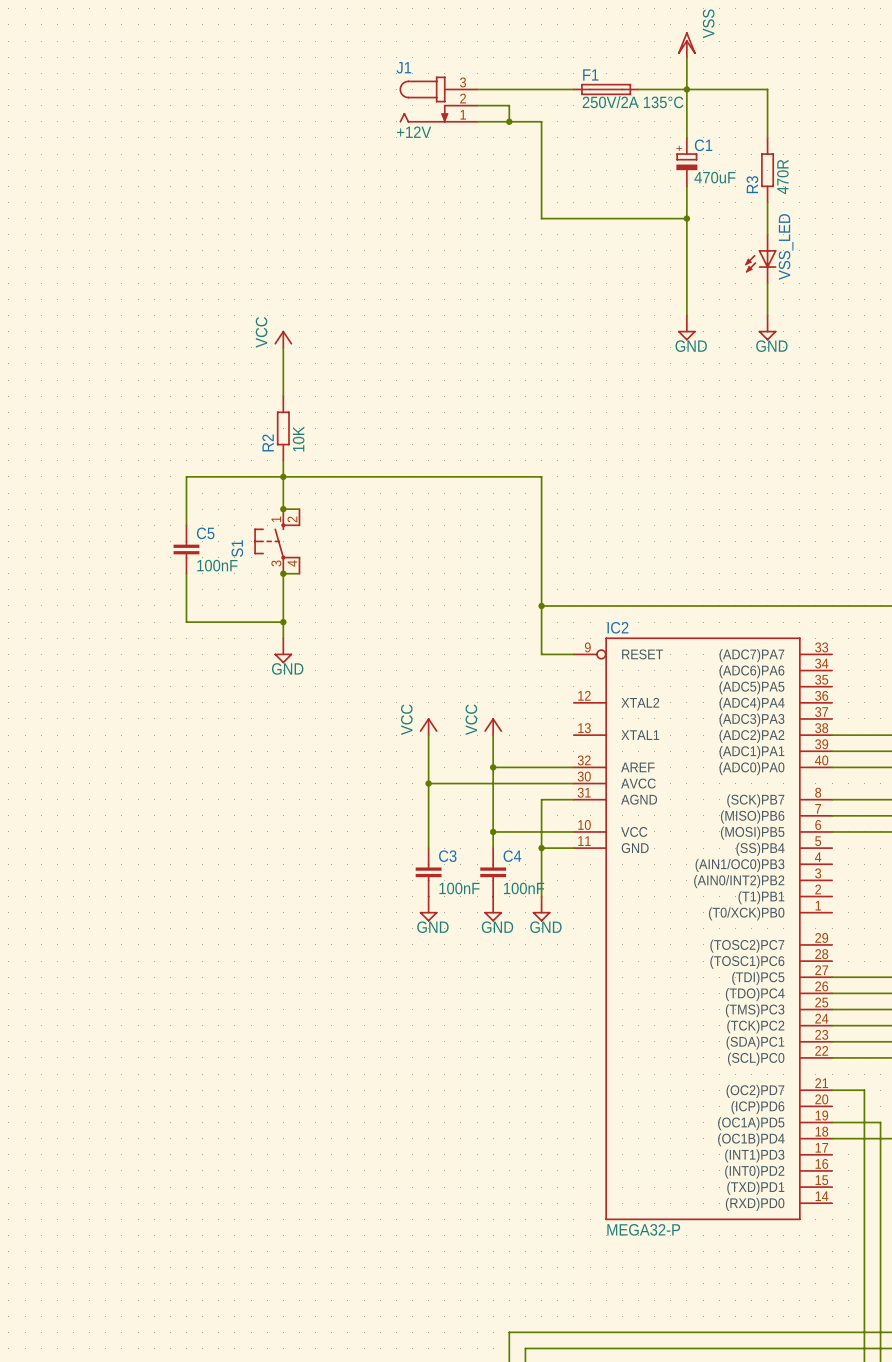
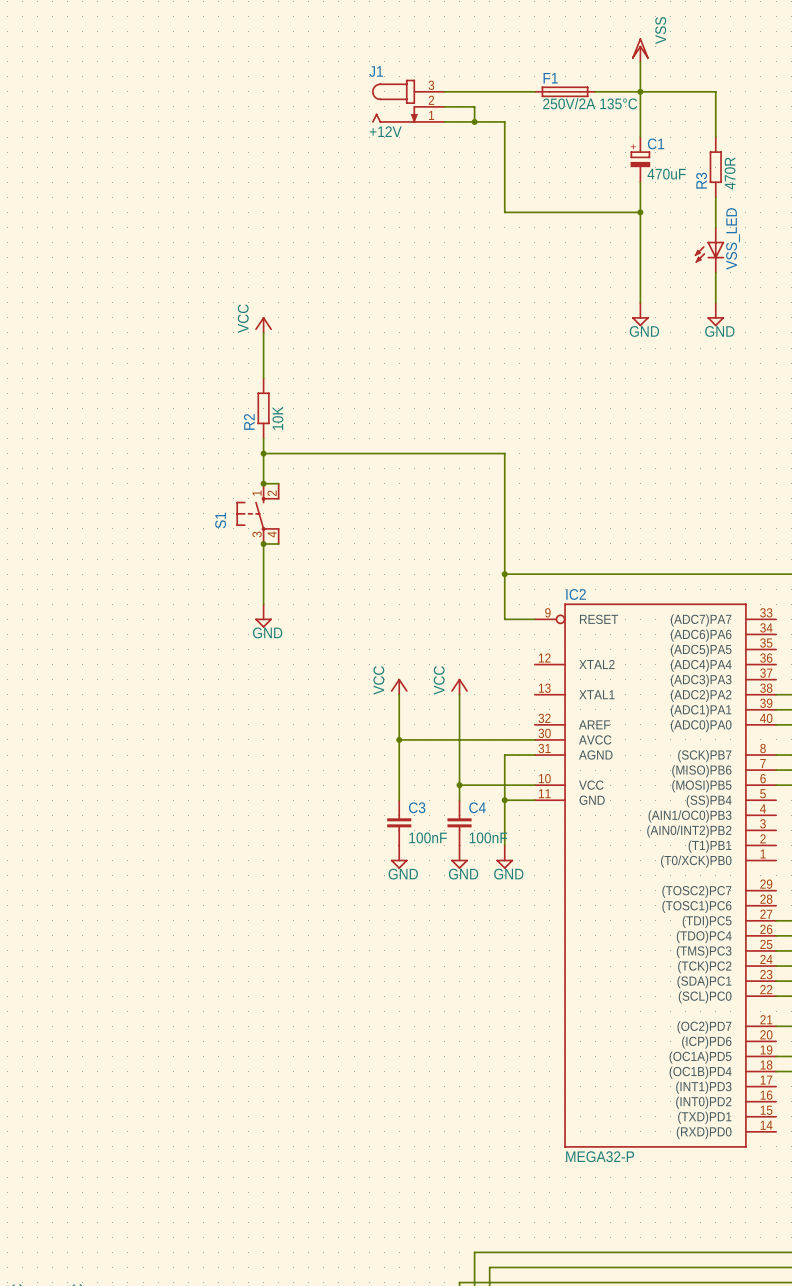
wire: (283, 476) (186, 476) (186, 525) -> none
C5: 100nF (186, 549) -> none
wire: (186, 573) (186, 622) (283, 622) -> none
junction: (283, 622) -> none
wire: (493, 767) (573, 767) -> none
junction: (493, 767) -> none

